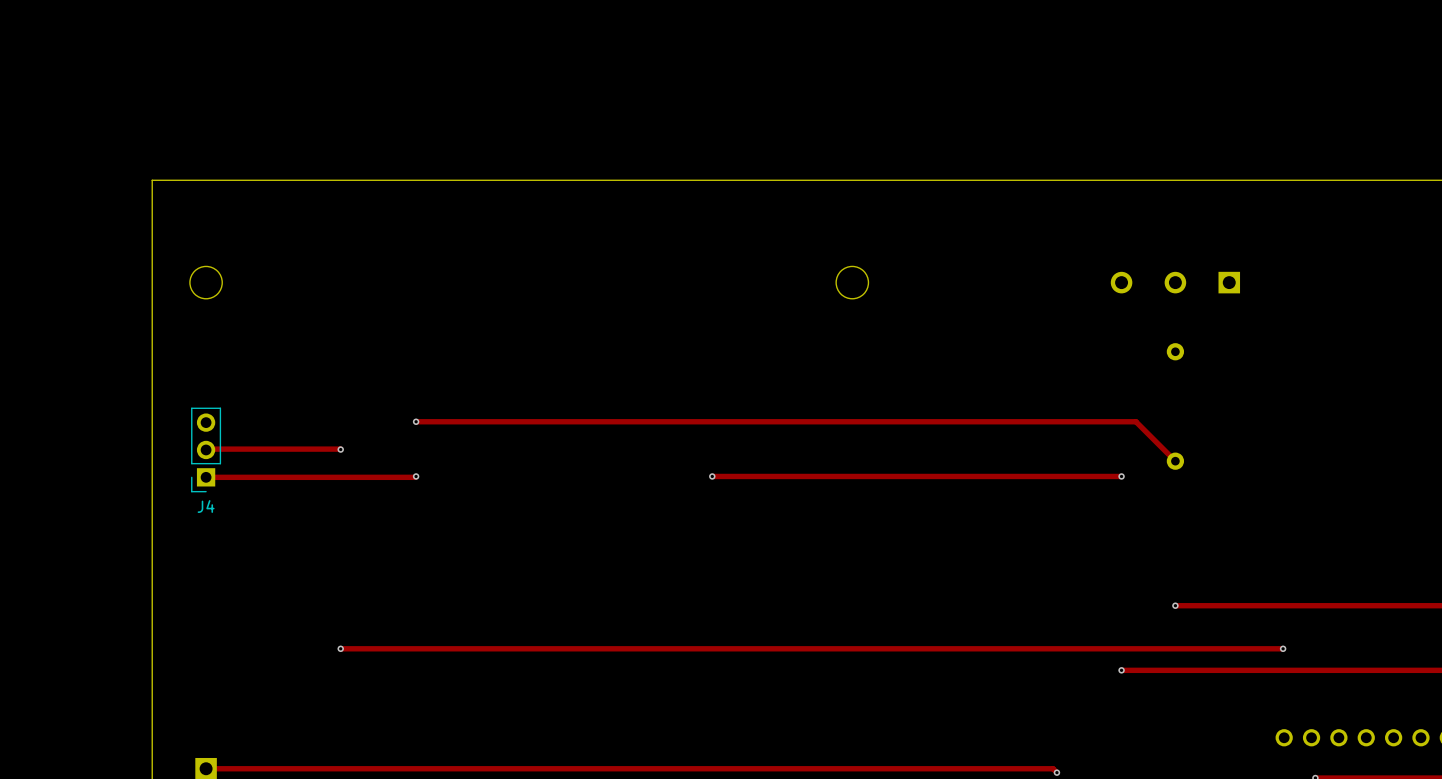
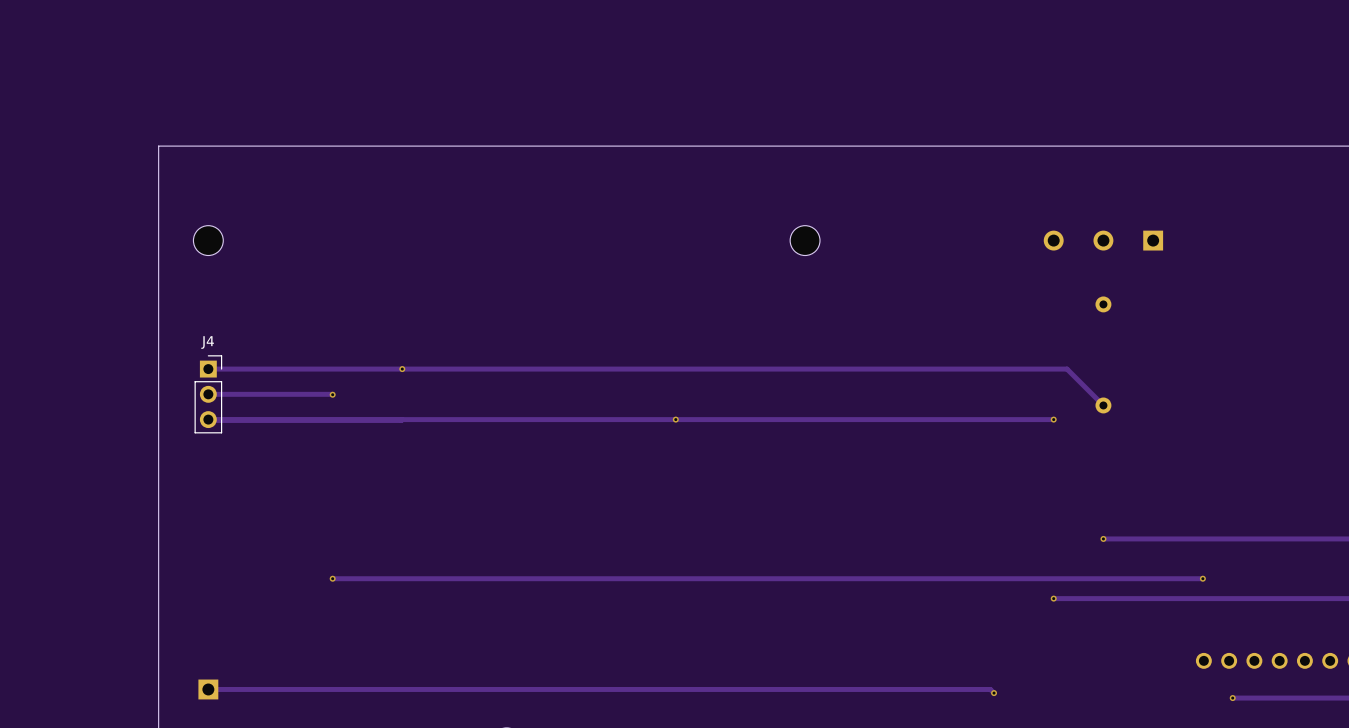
track: none -> (208, 369) (402, 369)
J4 rotation: 0° (206, 449) -> 180° (208, 394)
track: none -> (208, 419) (675, 419)
via: (416, 476) -> none

